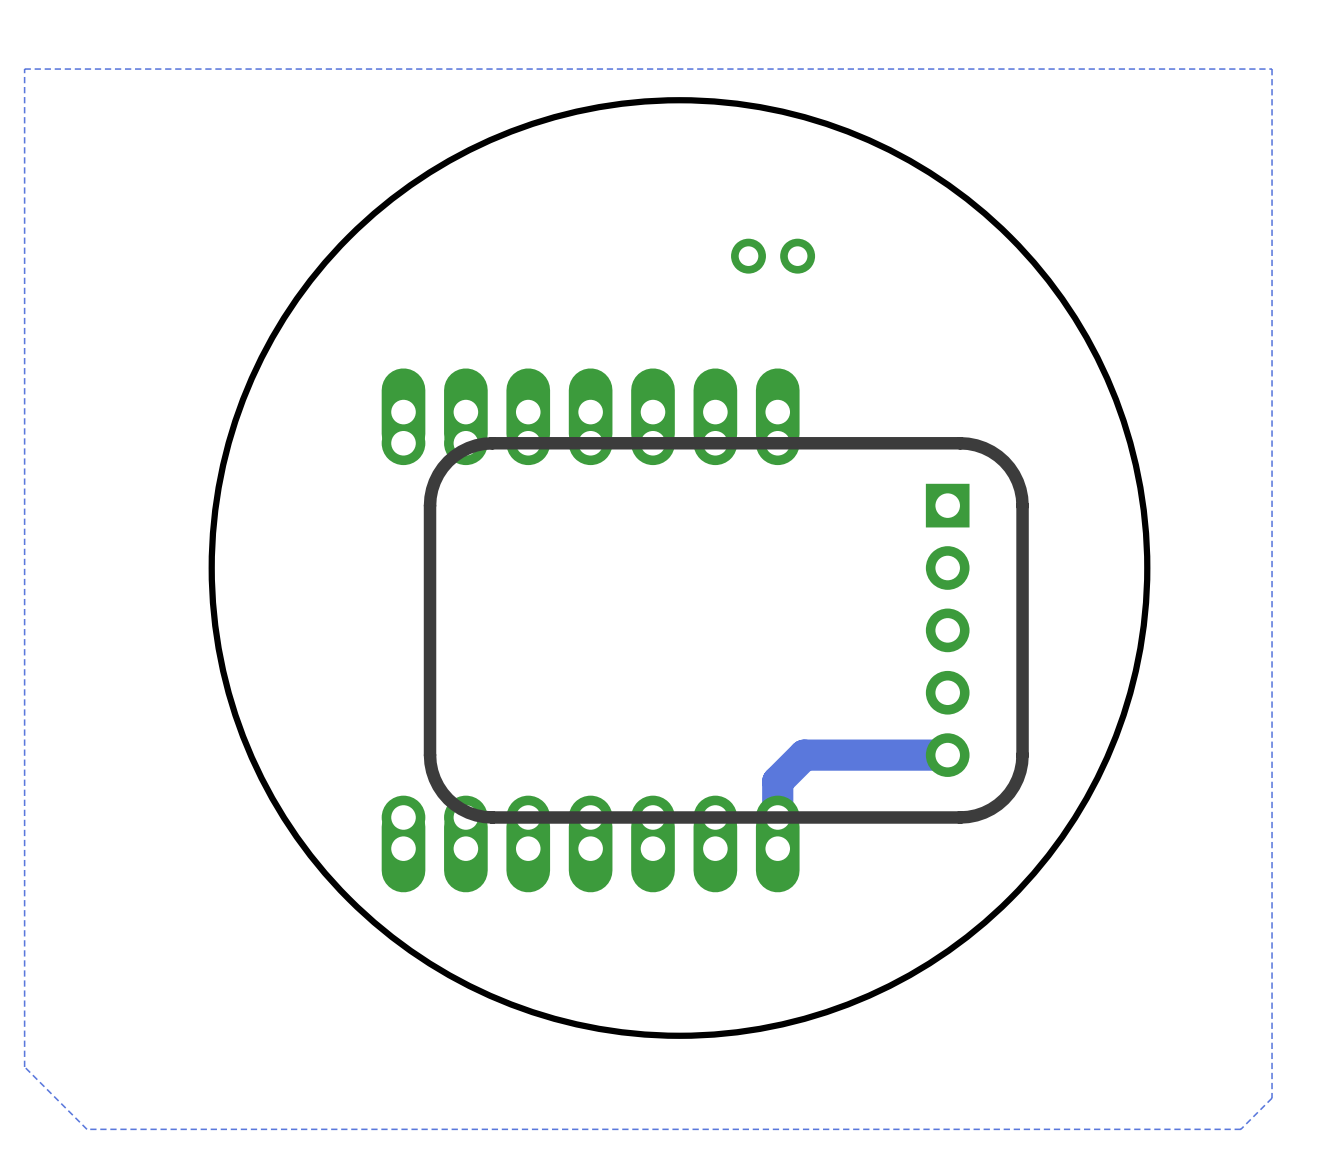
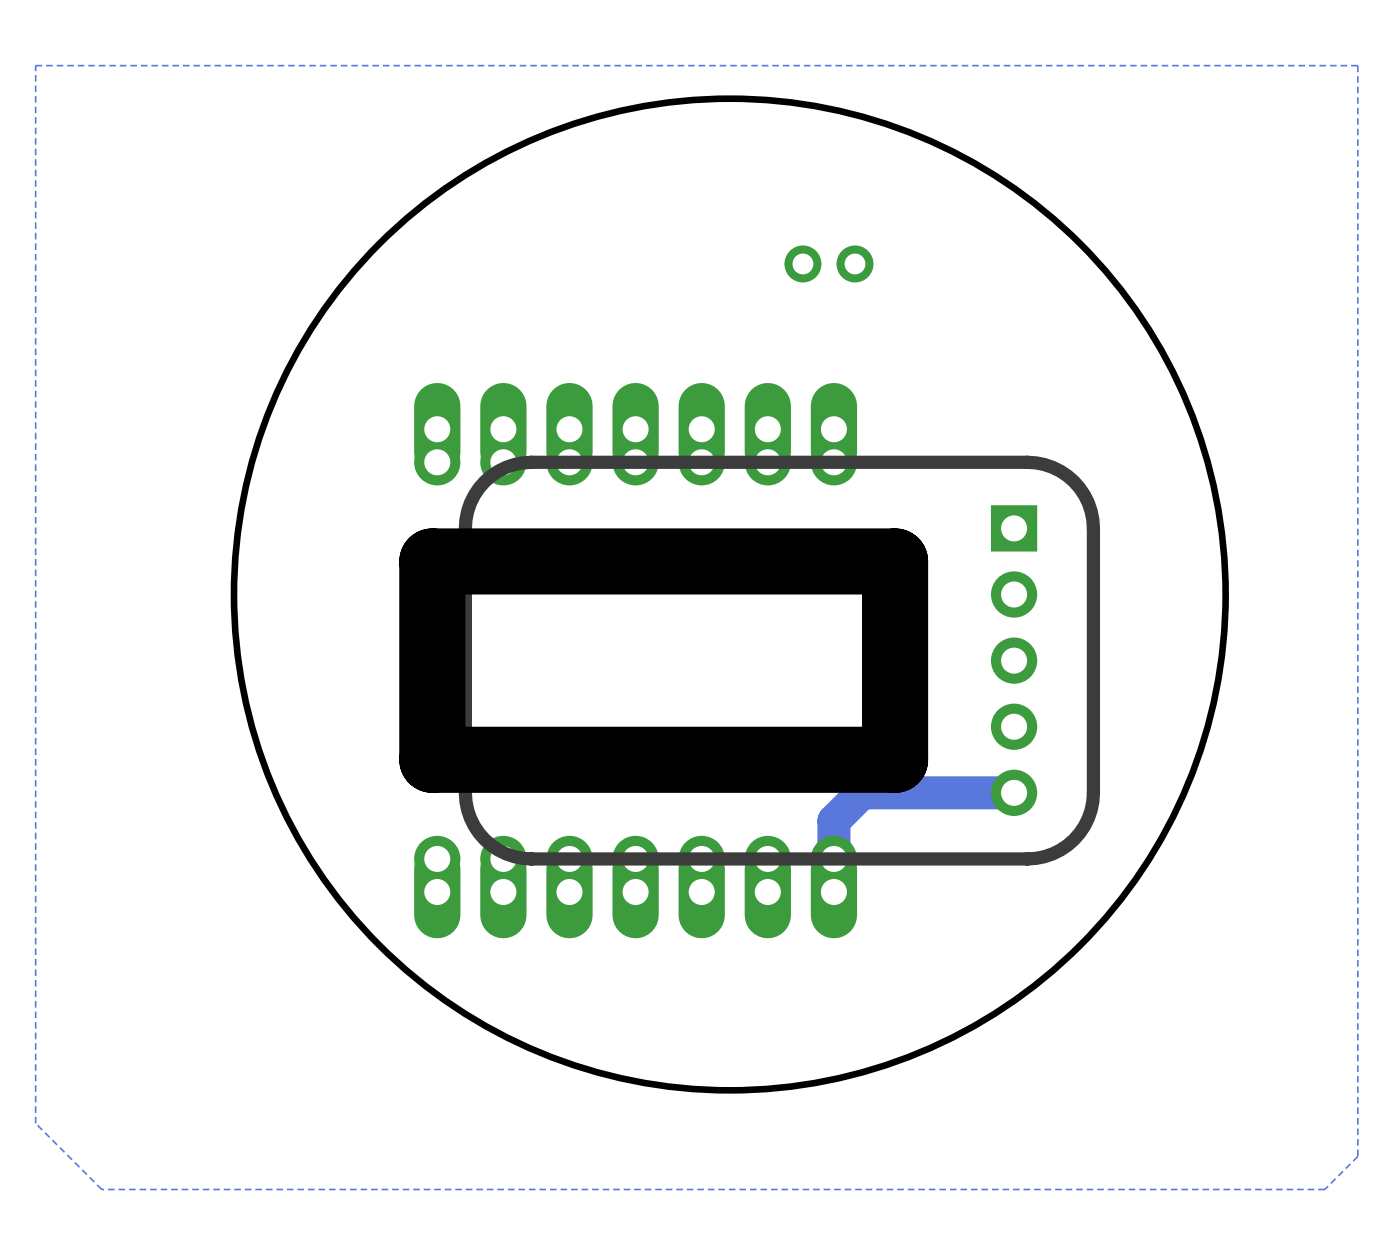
board edge: none -> (895, 561) (432, 561) (432, 759) (895, 759) (895, 561)

